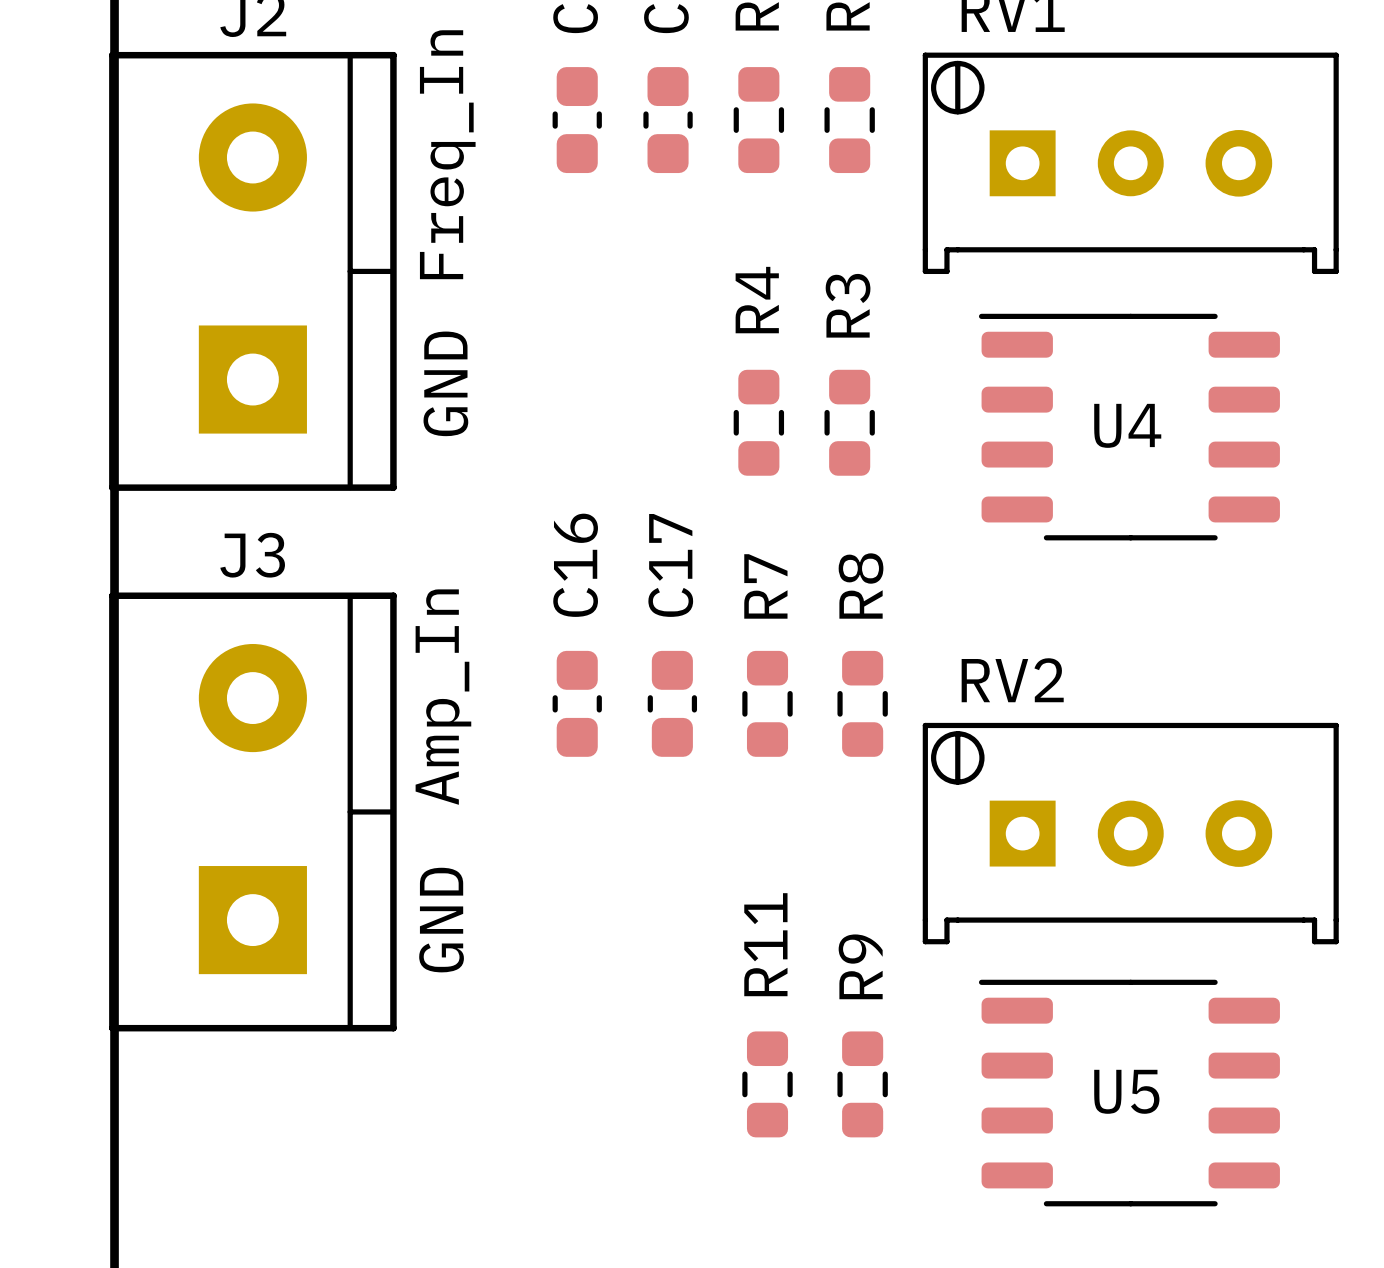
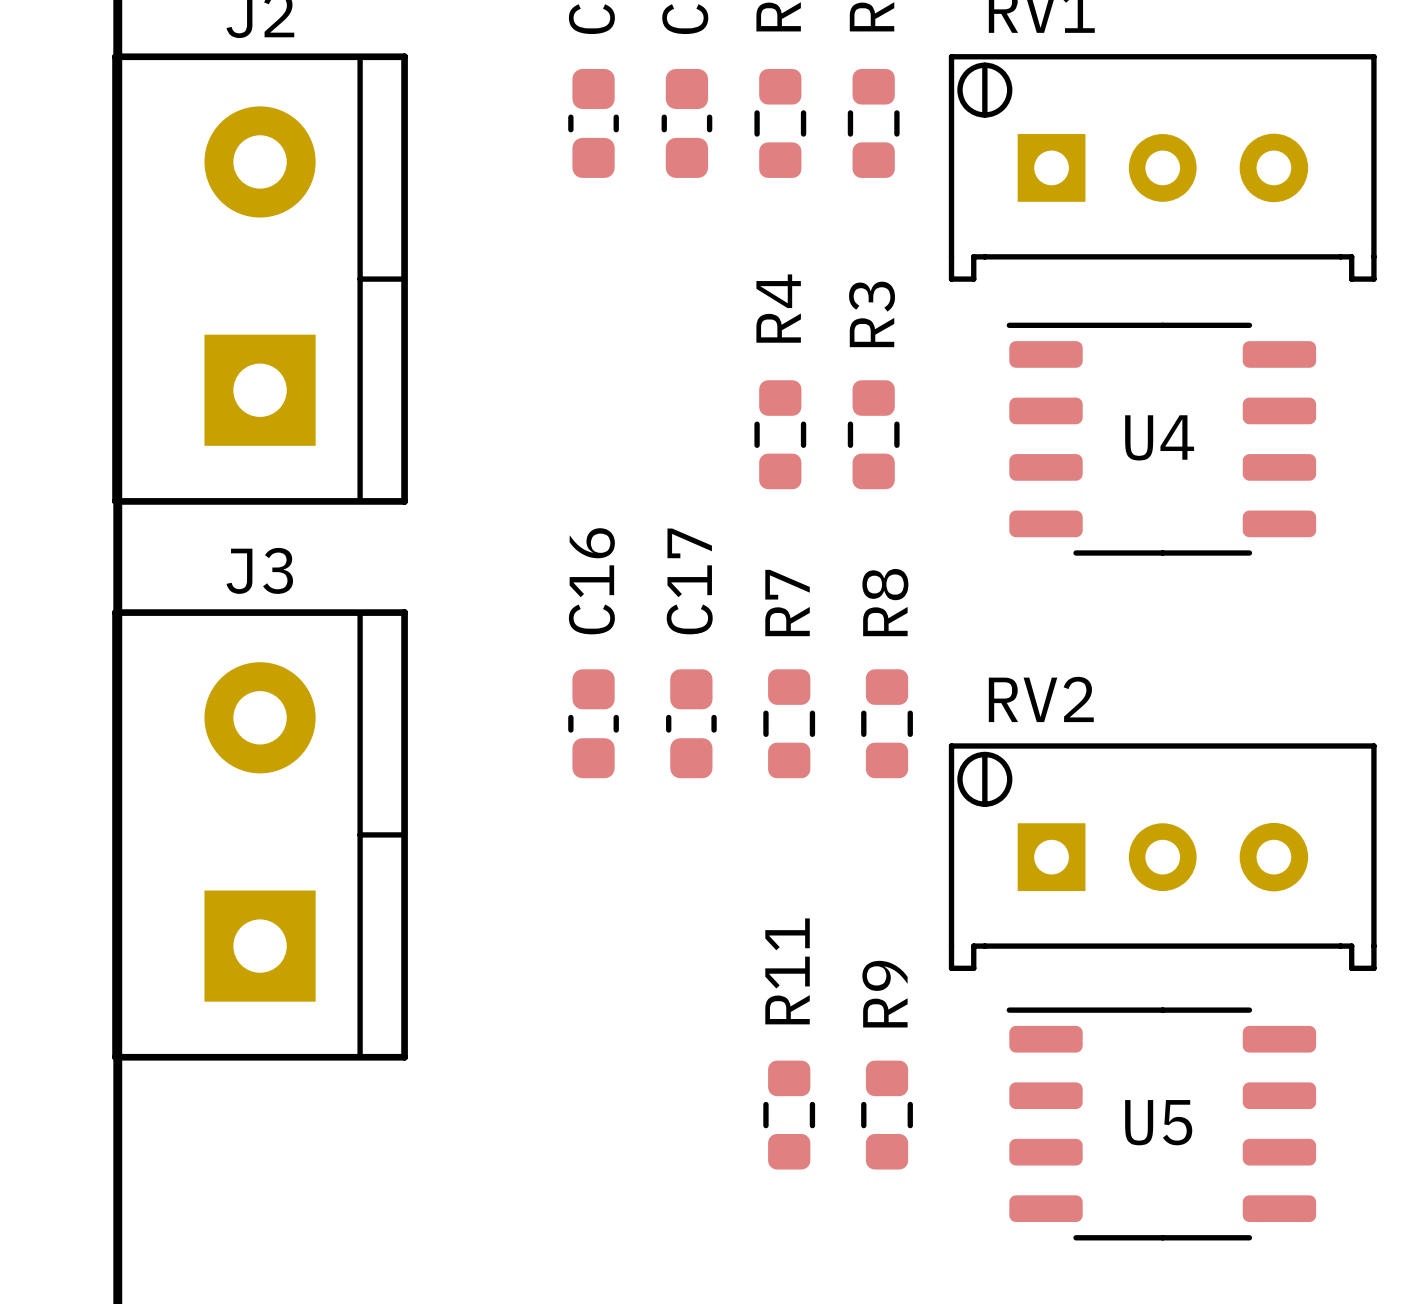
text: Freq_In (447, 154) -> none
text: GND (445, 383) -> none
text: Amp_In (443, 697) -> none
text: GND (441, 920) -> none

